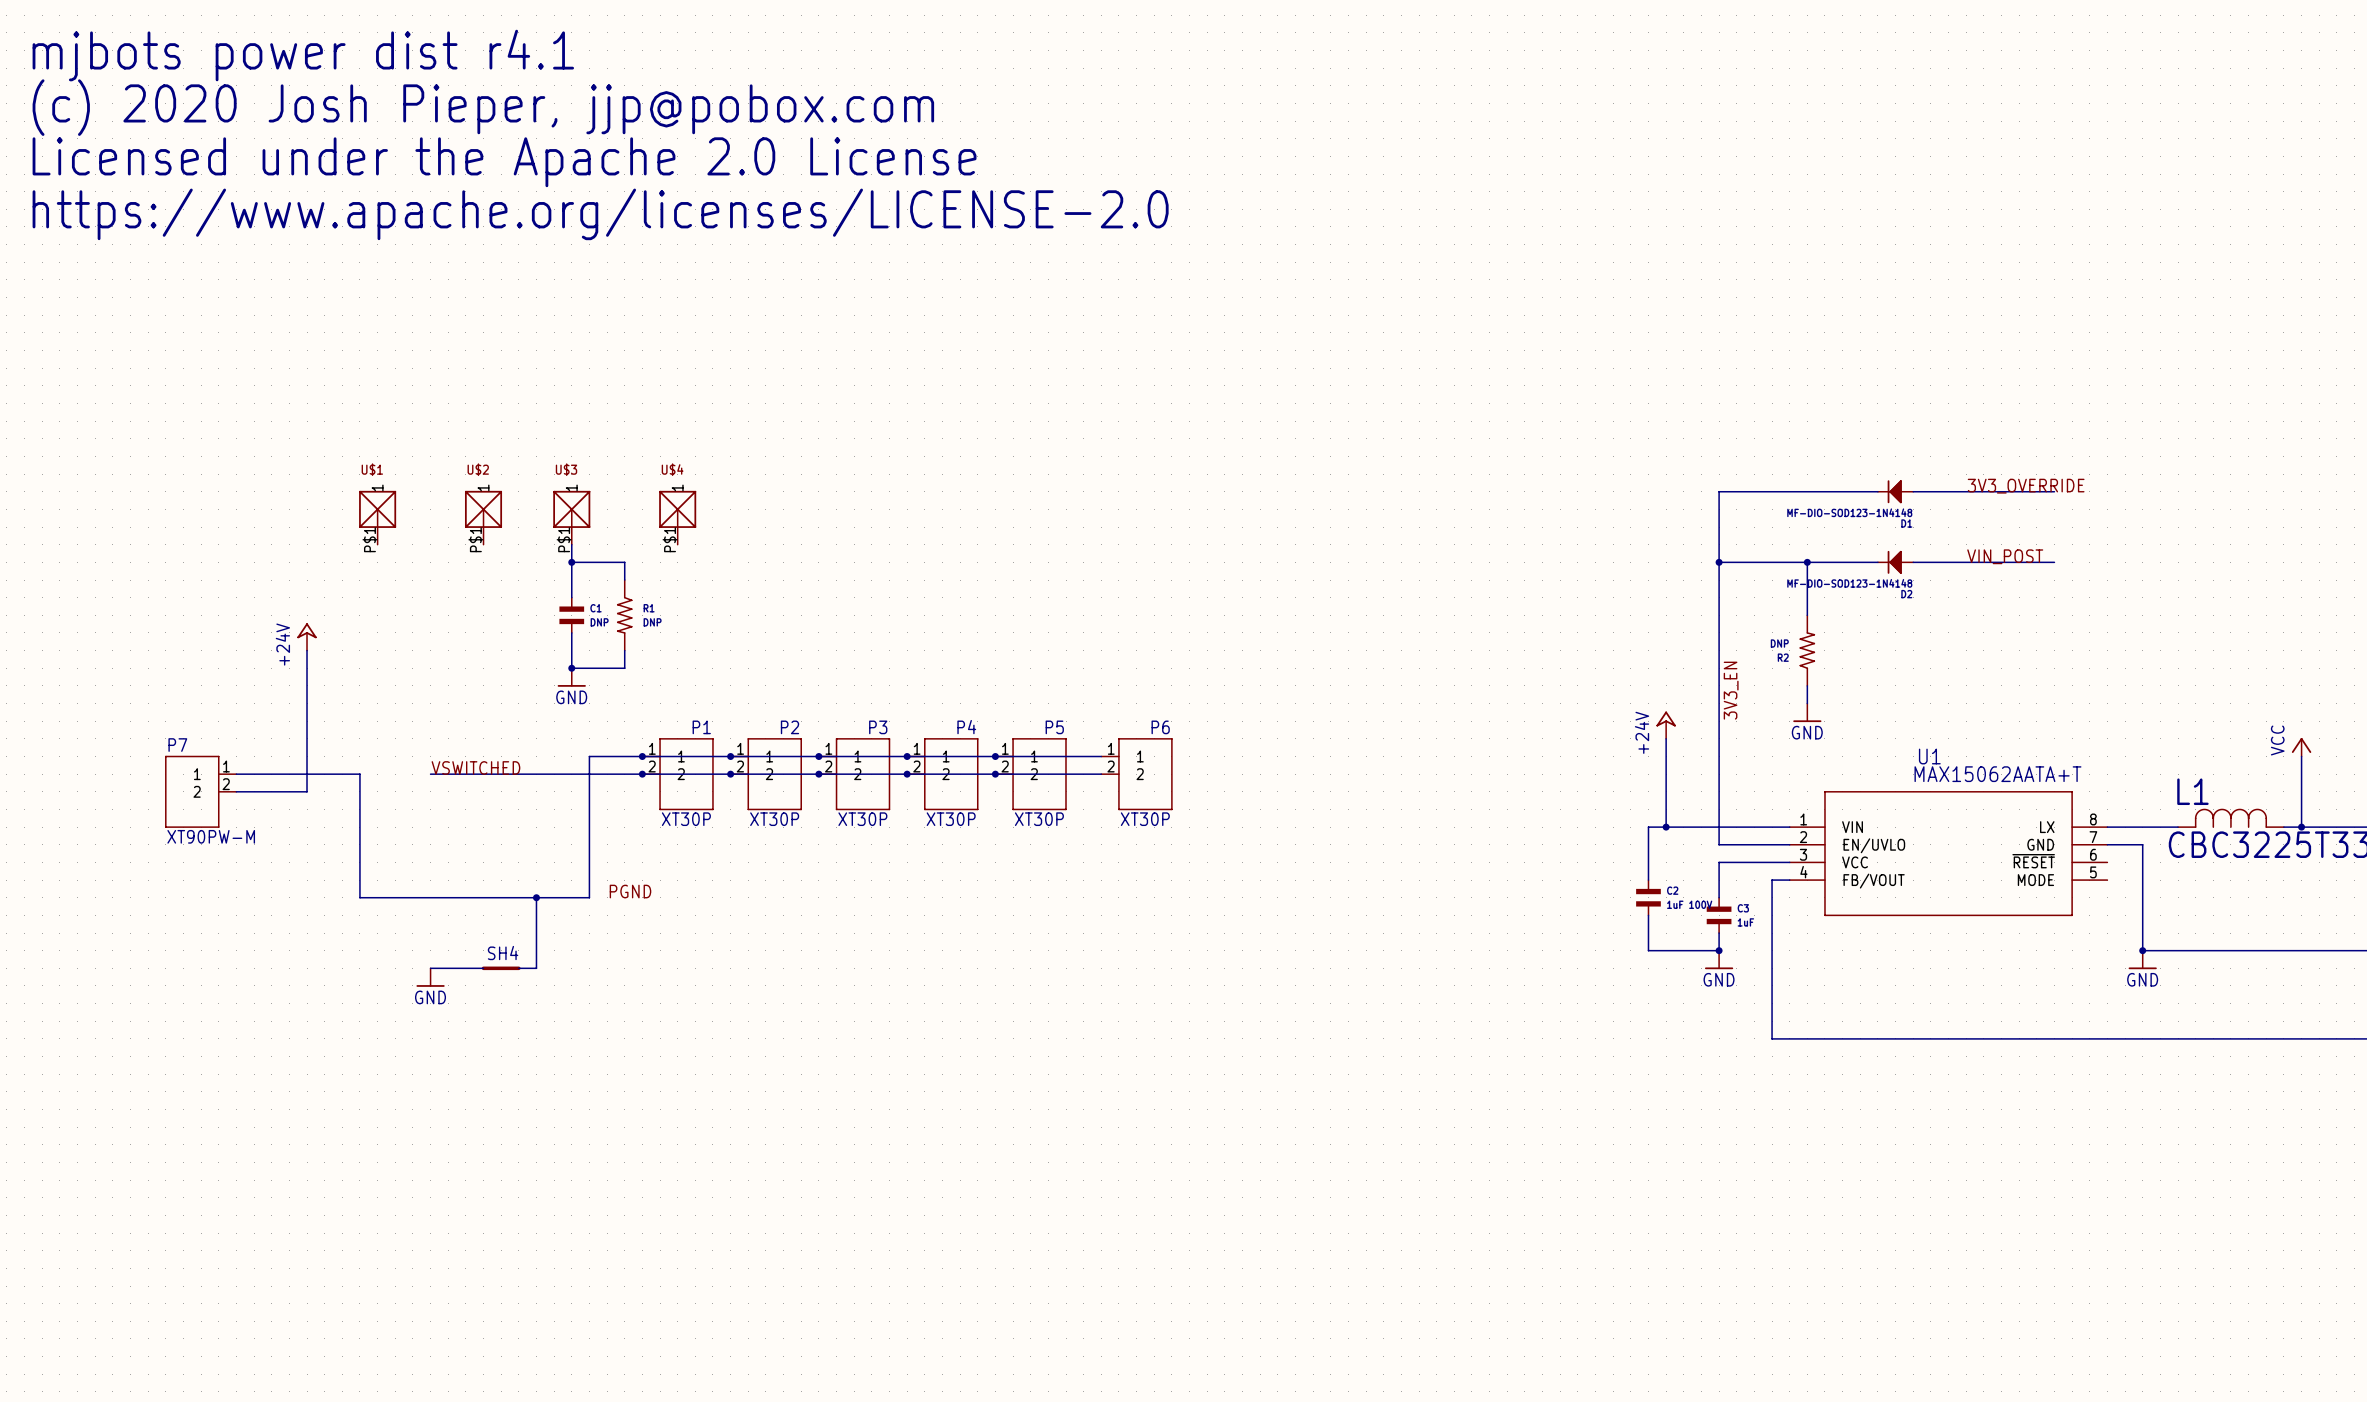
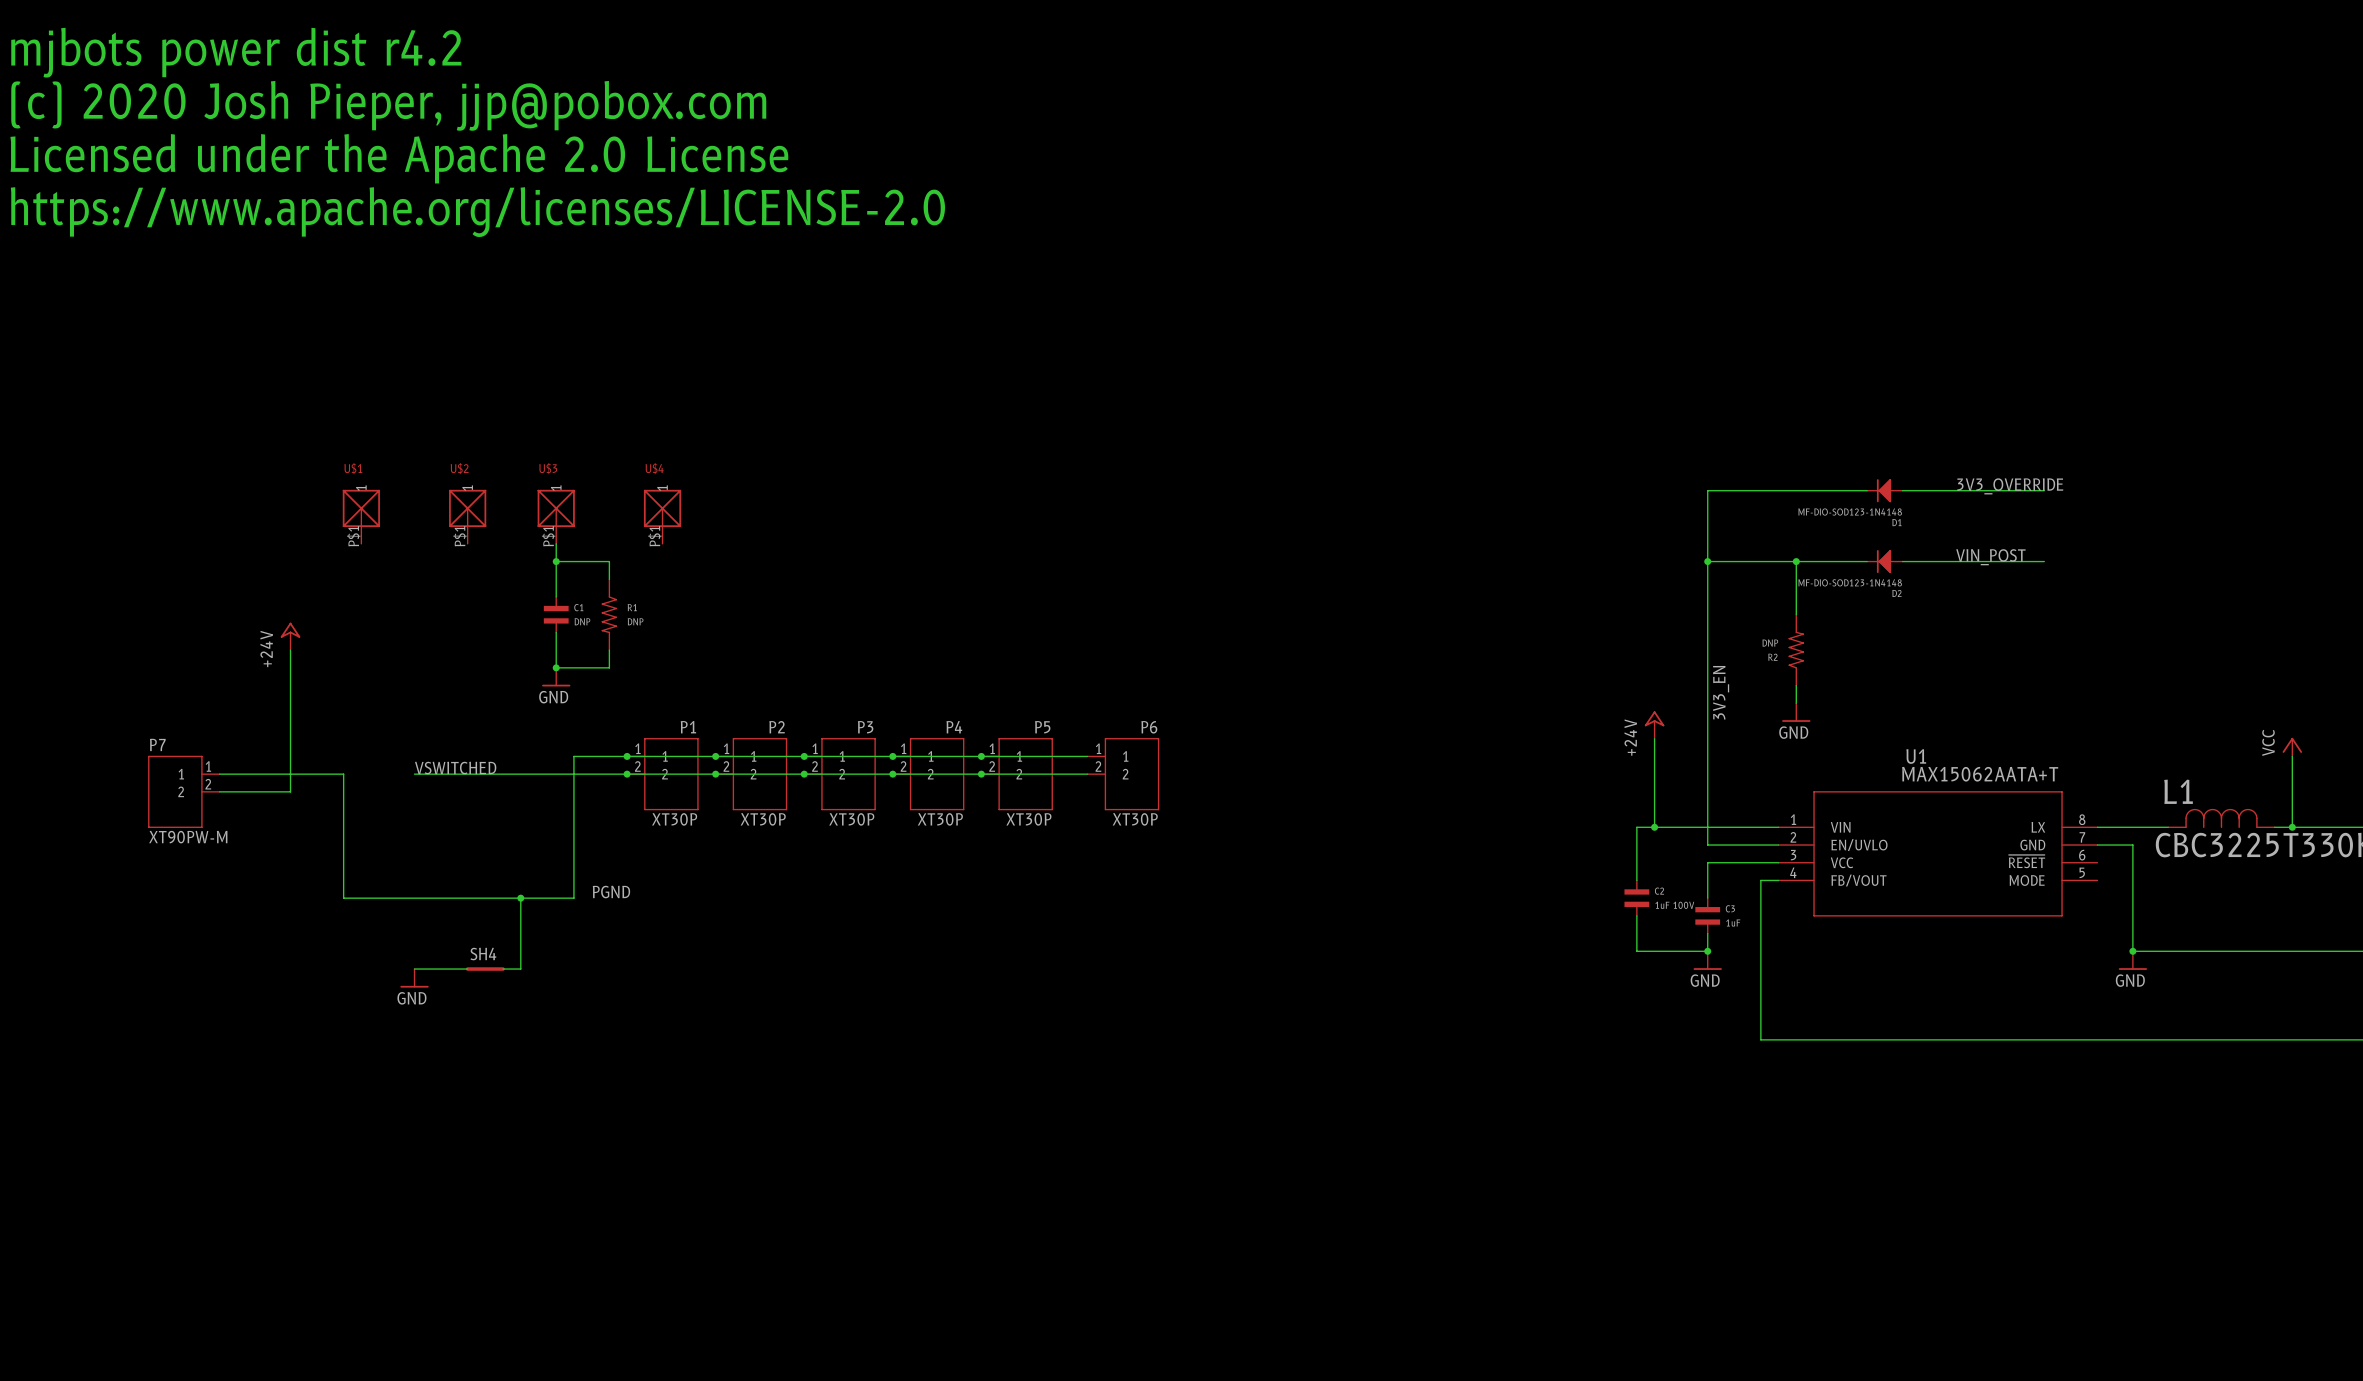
text: mjbots power dist r4.1 (303, 55) -> mjbots power dist r4.2 (236, 52)

